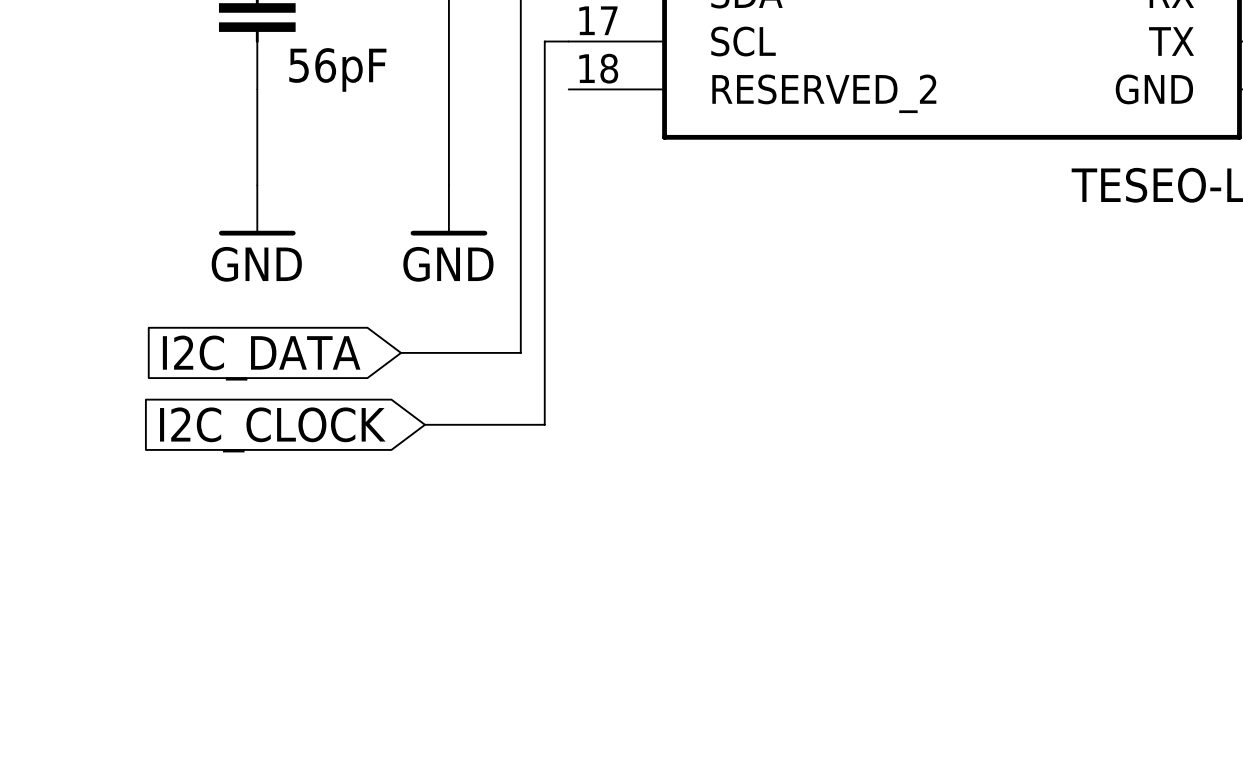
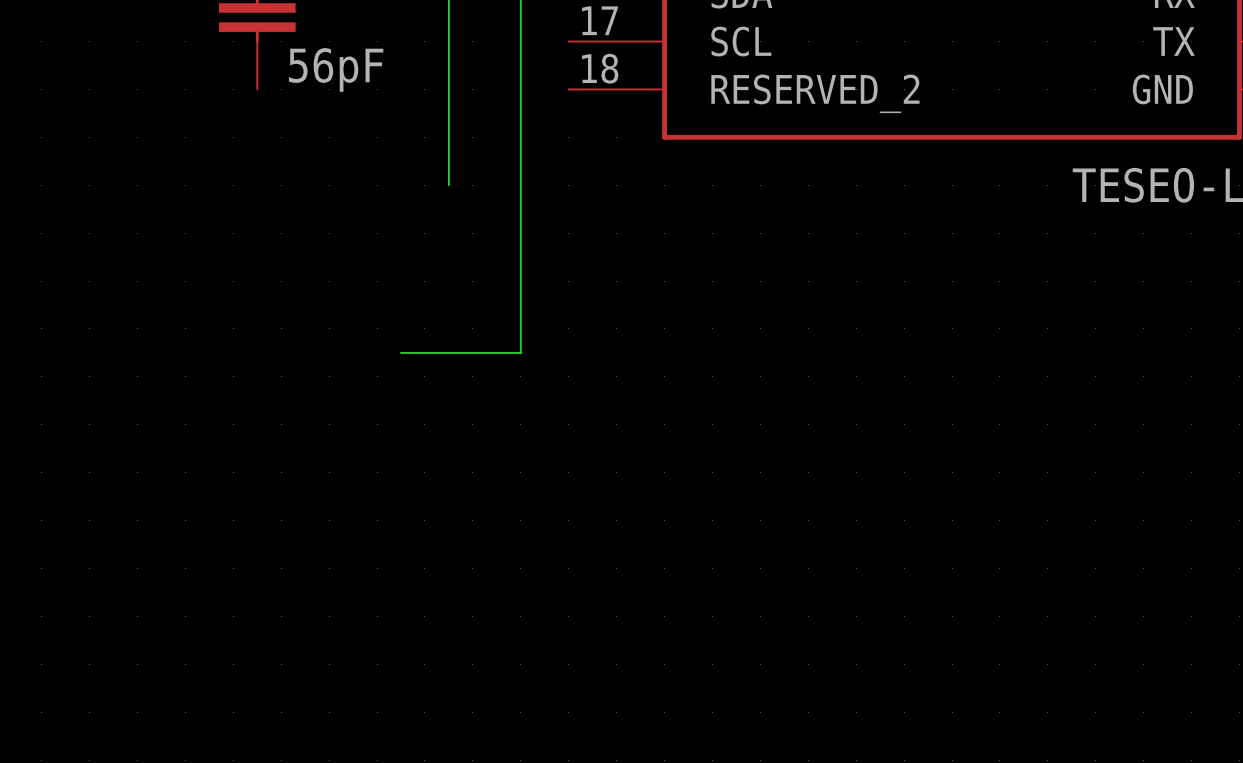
wire: (568, 41) (544, 41) (544, 424) (424, 424) -> none
wire: (257, 89) (257, 185) -> none
power symbol: GND (257, 210) -> none
power symbol: GND (448, 210) -> none
global label: I2C_DATA (261, 358) -> none
global label: I2C_CLOCK (272, 429) -> none

